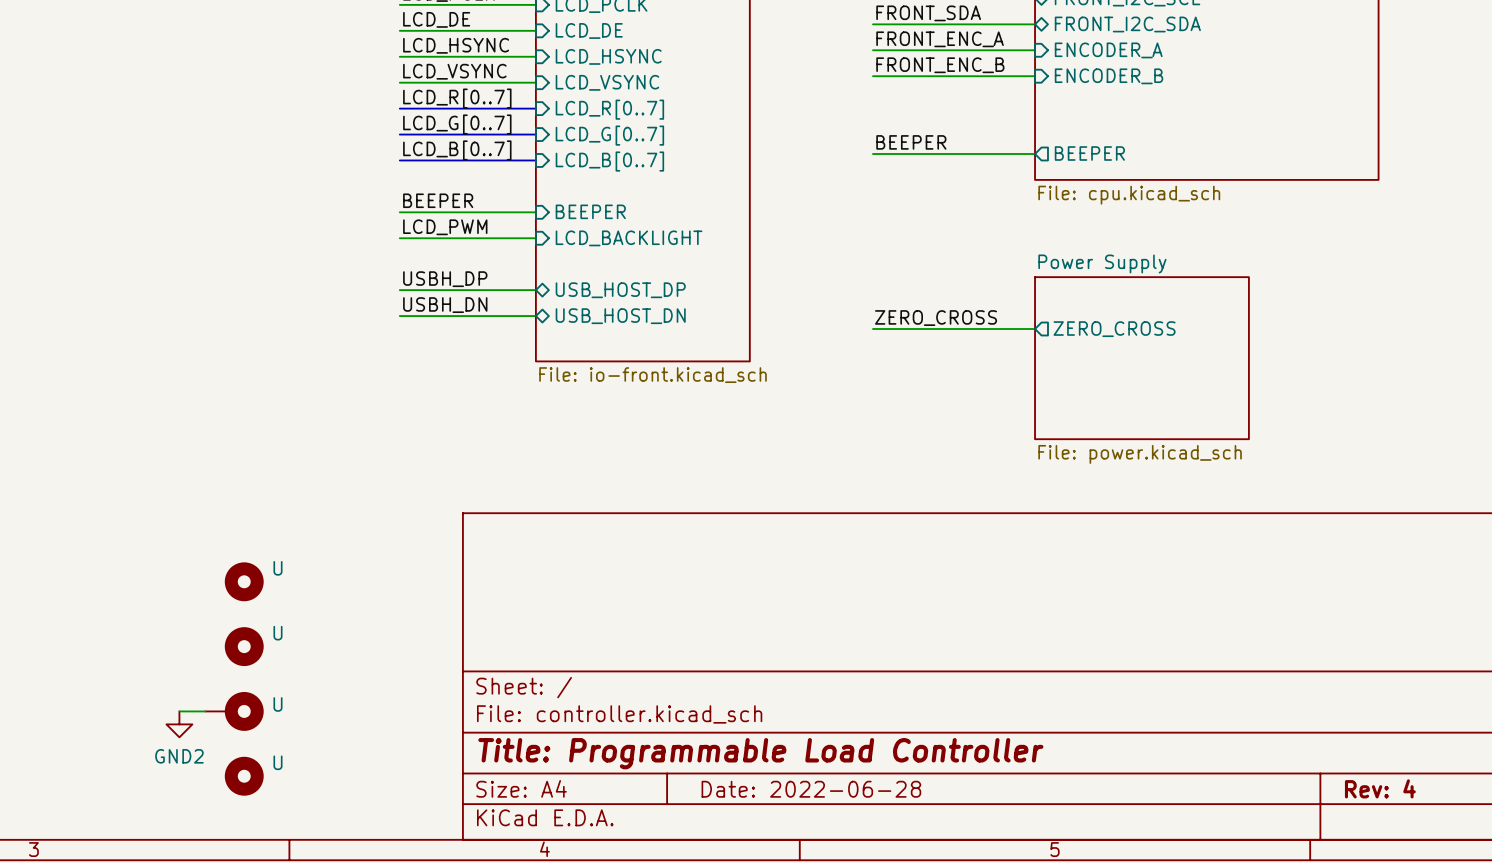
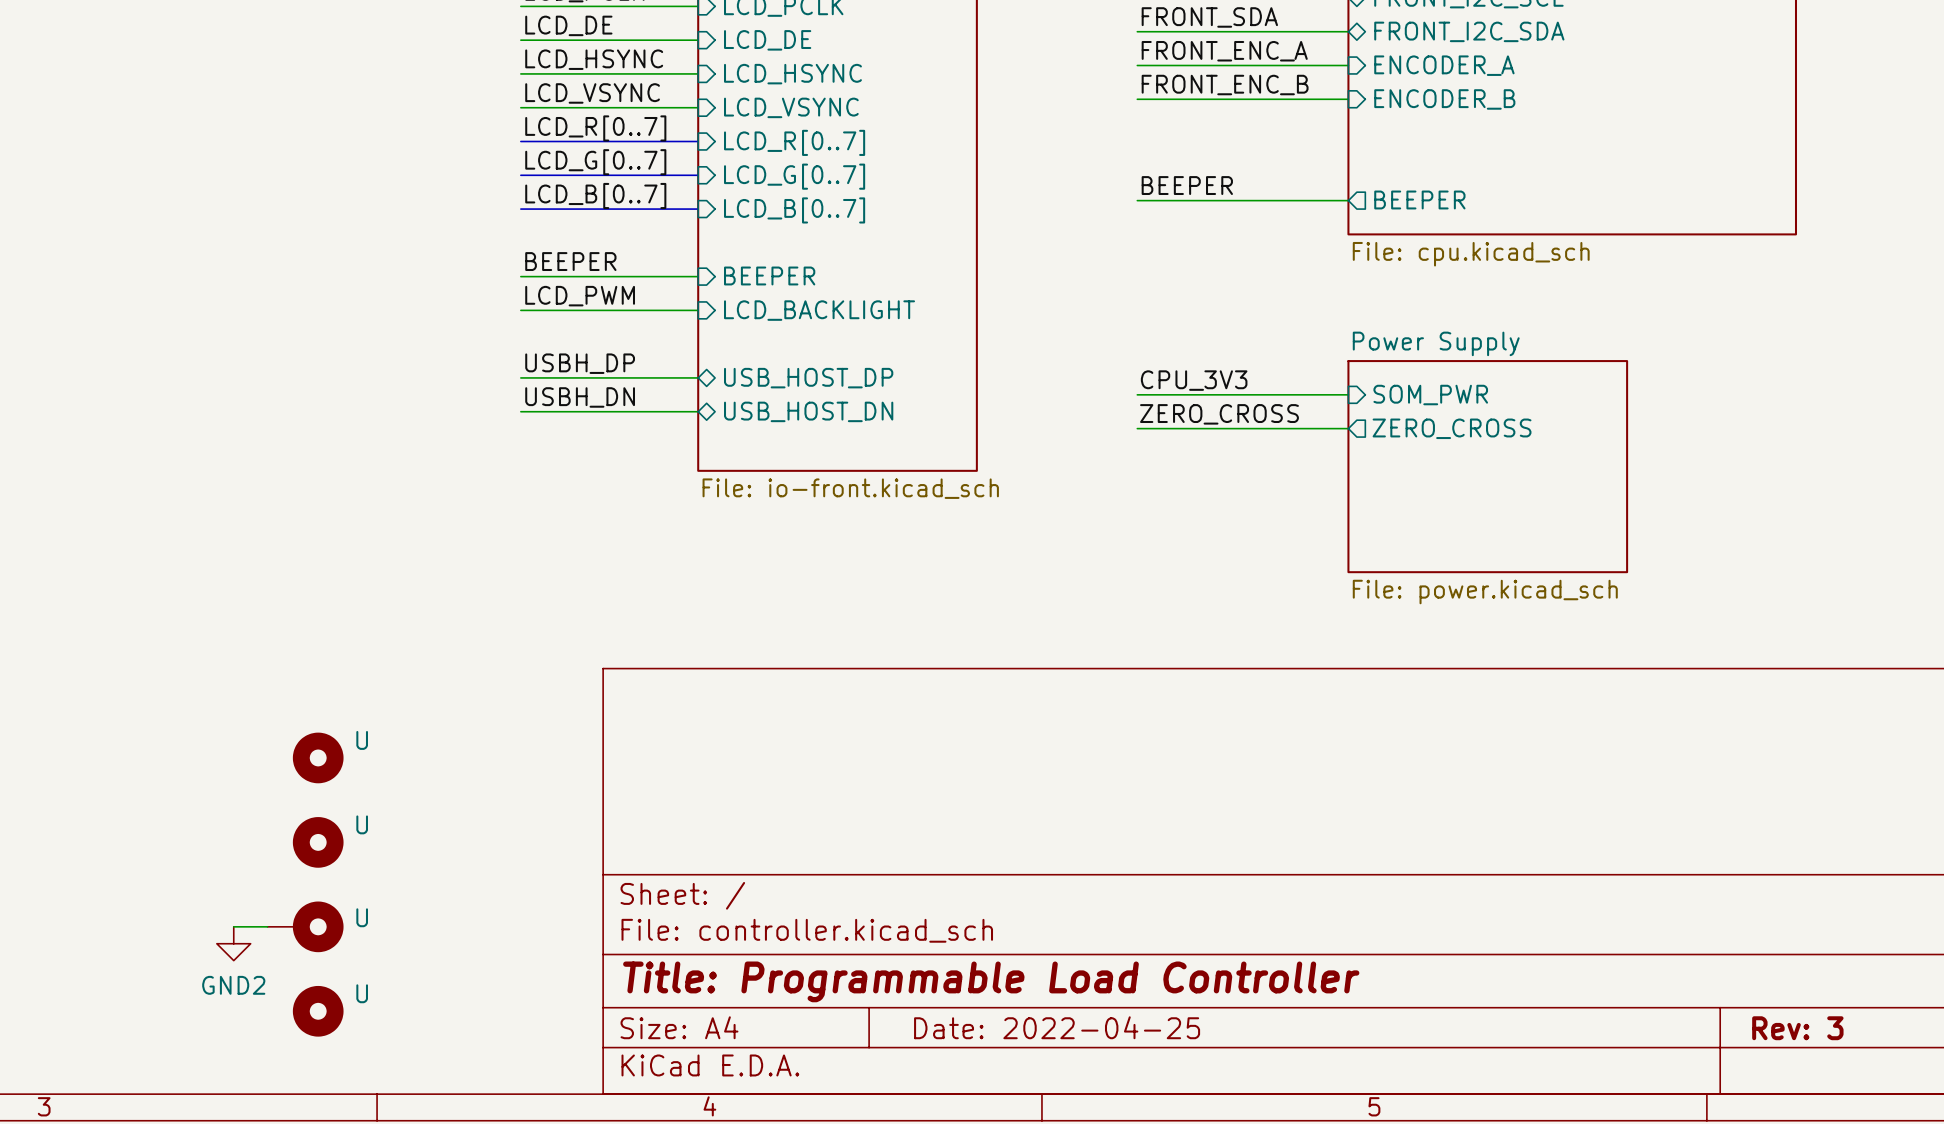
label: none -> CPU_3V3 (1194, 380)
wire: none -> (1137, 394) (1348, 394)
sheet pin: none -> SOM_PWR (1430, 395)
title block: Rev: 4 (1380, 788) -> Rev: 3 (1797, 1028)
title block: Date: 2022-06-28 (811, 789) -> Date: 2022-04-25 (1057, 1027)

